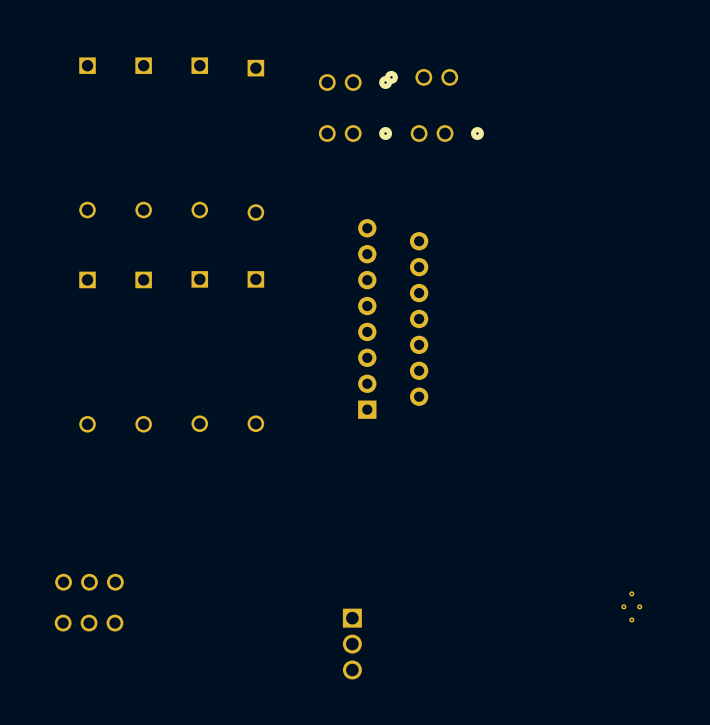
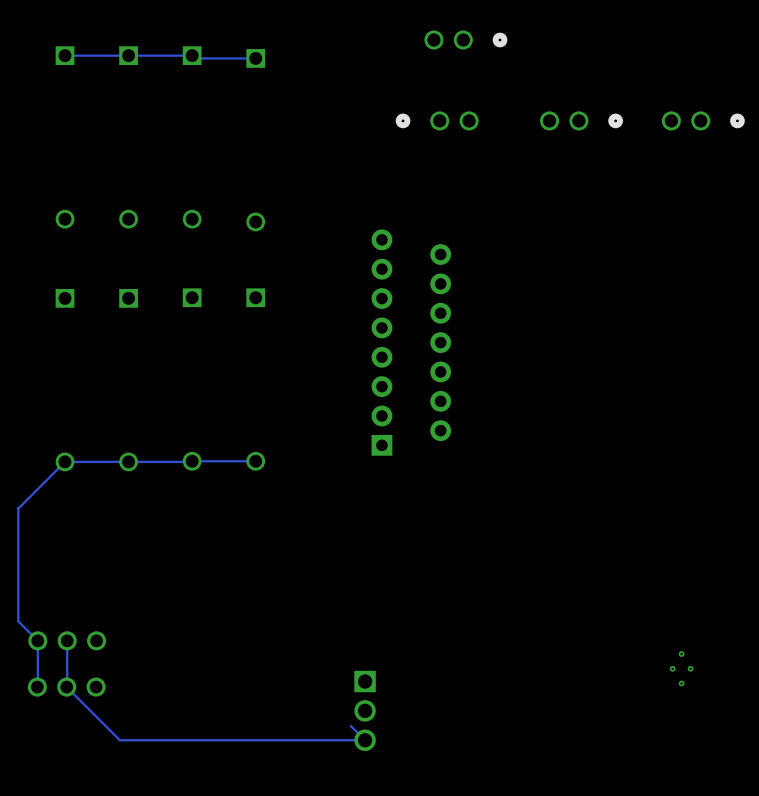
part: none -> (465, 40)
track: none -> (65, 55) (192, 55) (194, 58) (255, 58)
part: (421, 77) -> none
part: (355, 82) -> none
part: none -> (437, 120)
part: none -> (581, 120)
part: none -> (703, 120)
part: (355, 133) -> none
part: (447, 133) -> none
track: none -> (255, 461) (65, 461) (18, 508) (18, 621) (37, 640) (37, 687)
track: none -> (67, 640) (66, 687) (119, 740) (365, 740) (350, 726)

